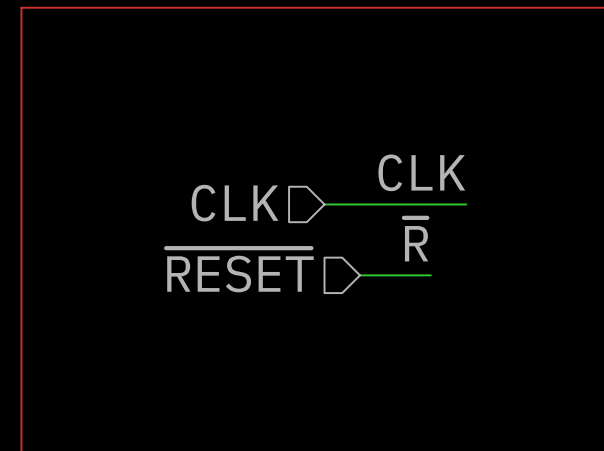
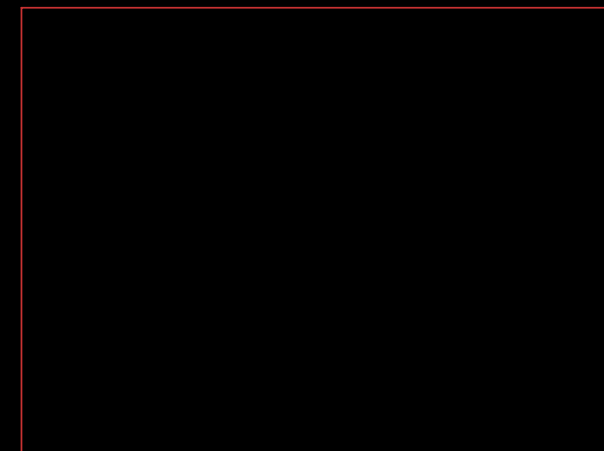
label: CLK (421, 172) -> none
hierarchical label: CLK (235, 203) -> none
wire: (324, 204) (466, 204) -> none
label: ~{R} (416, 239) -> none
hierarchical label: ~{RESET} (239, 270) -> none
wire: (359, 275) (430, 275) -> none

